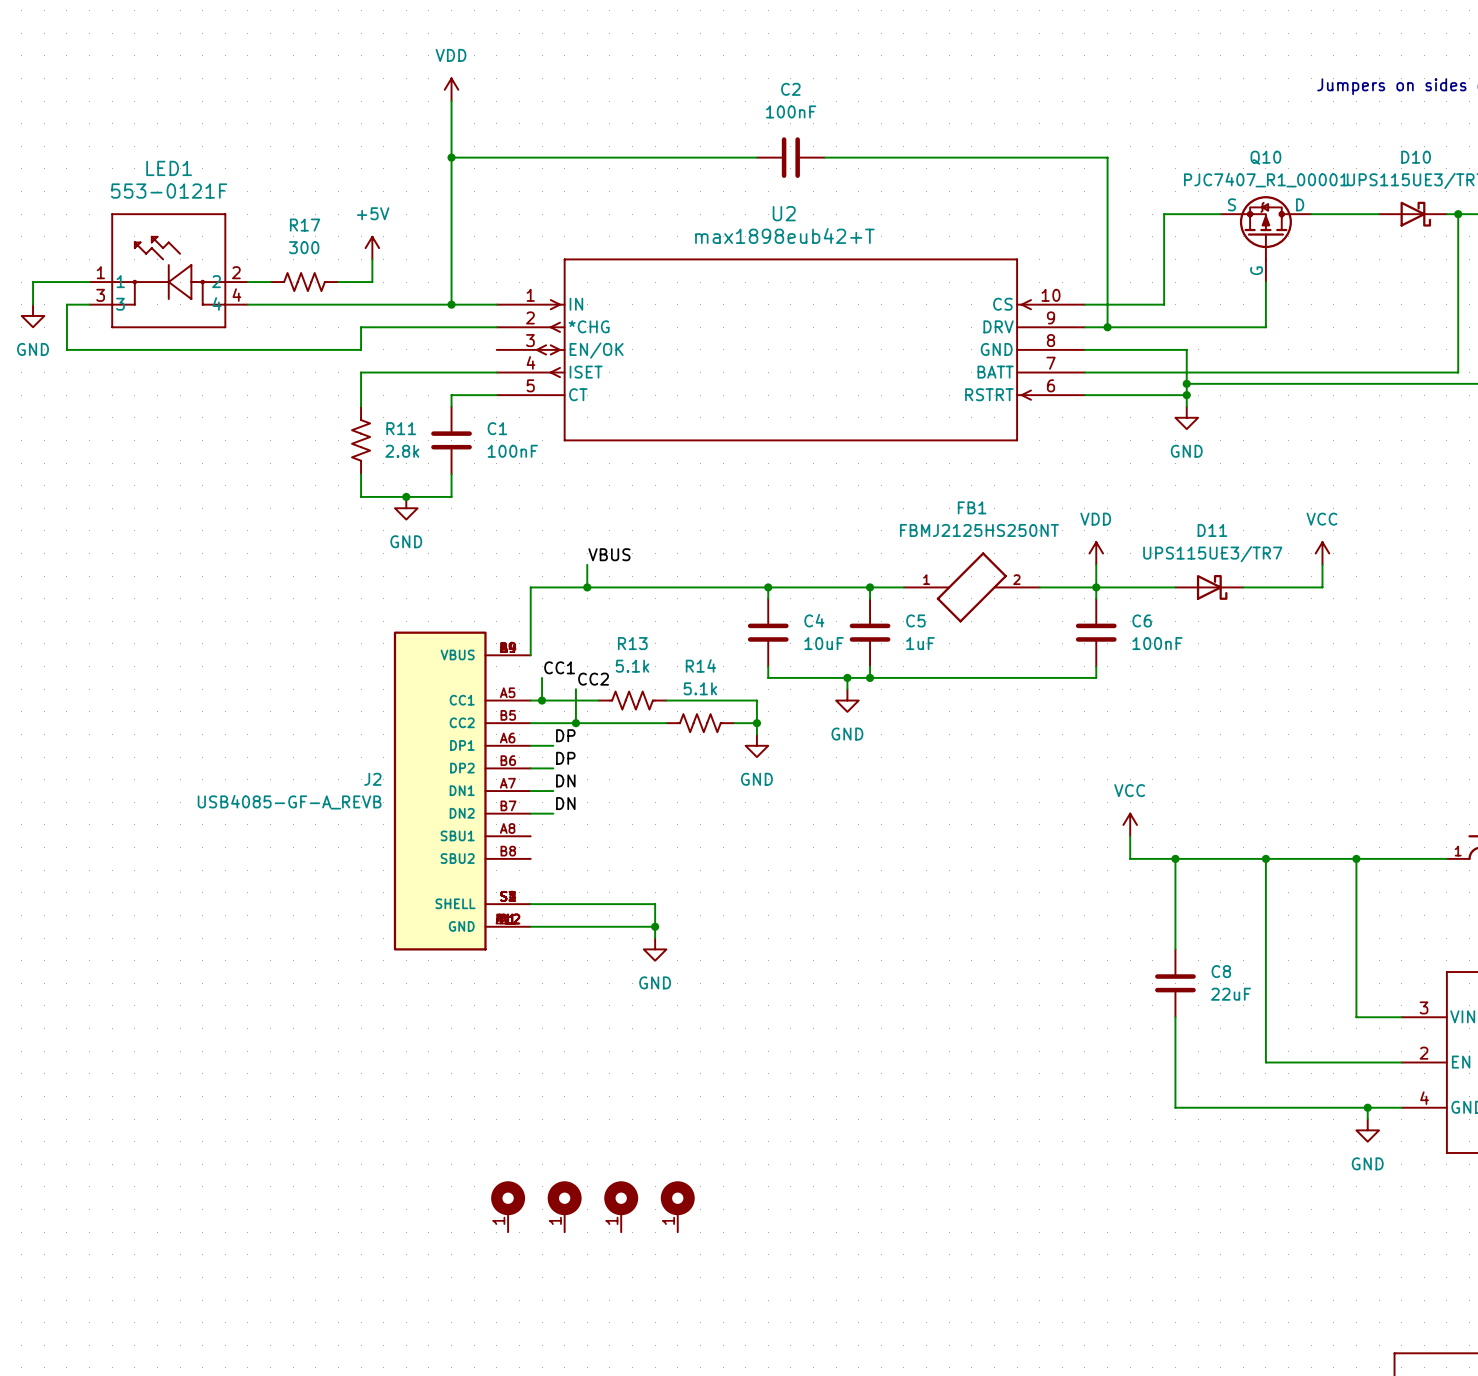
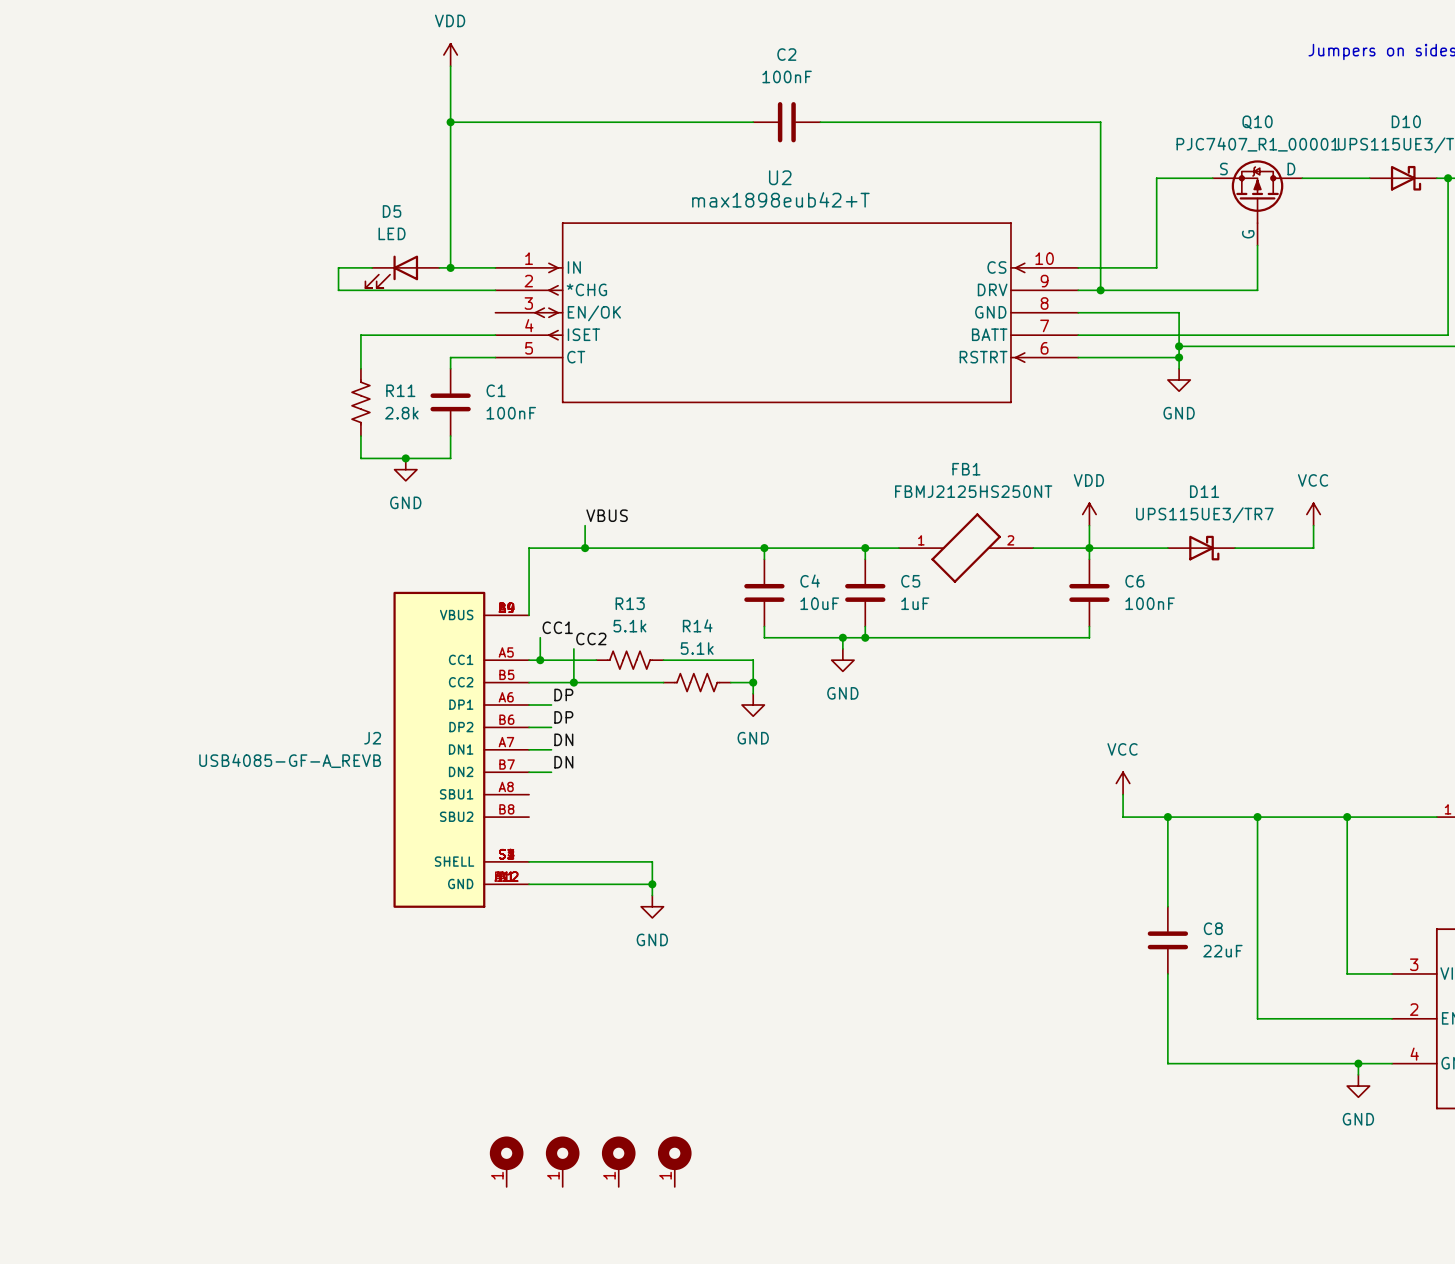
power symbol: +5V (372, 248) -> none
wire: (372, 259) (372, 282) (338, 282) -> none
LED1: 553-0121F (168, 270) -> none
wire: (89, 282) (33, 282) (33, 304) -> none
wire: (247, 282) (270, 282) -> none
R17: 300 (304, 282) -> none
wire: (89, 304) (66, 304) (66, 349) (361, 349) (361, 327) -> none
wire: (247, 304) (338, 304) -> (360, 290) (338, 290) (338, 267)
D5: none -> LED (402, 271)
power symbol: GND (33, 315) -> none

